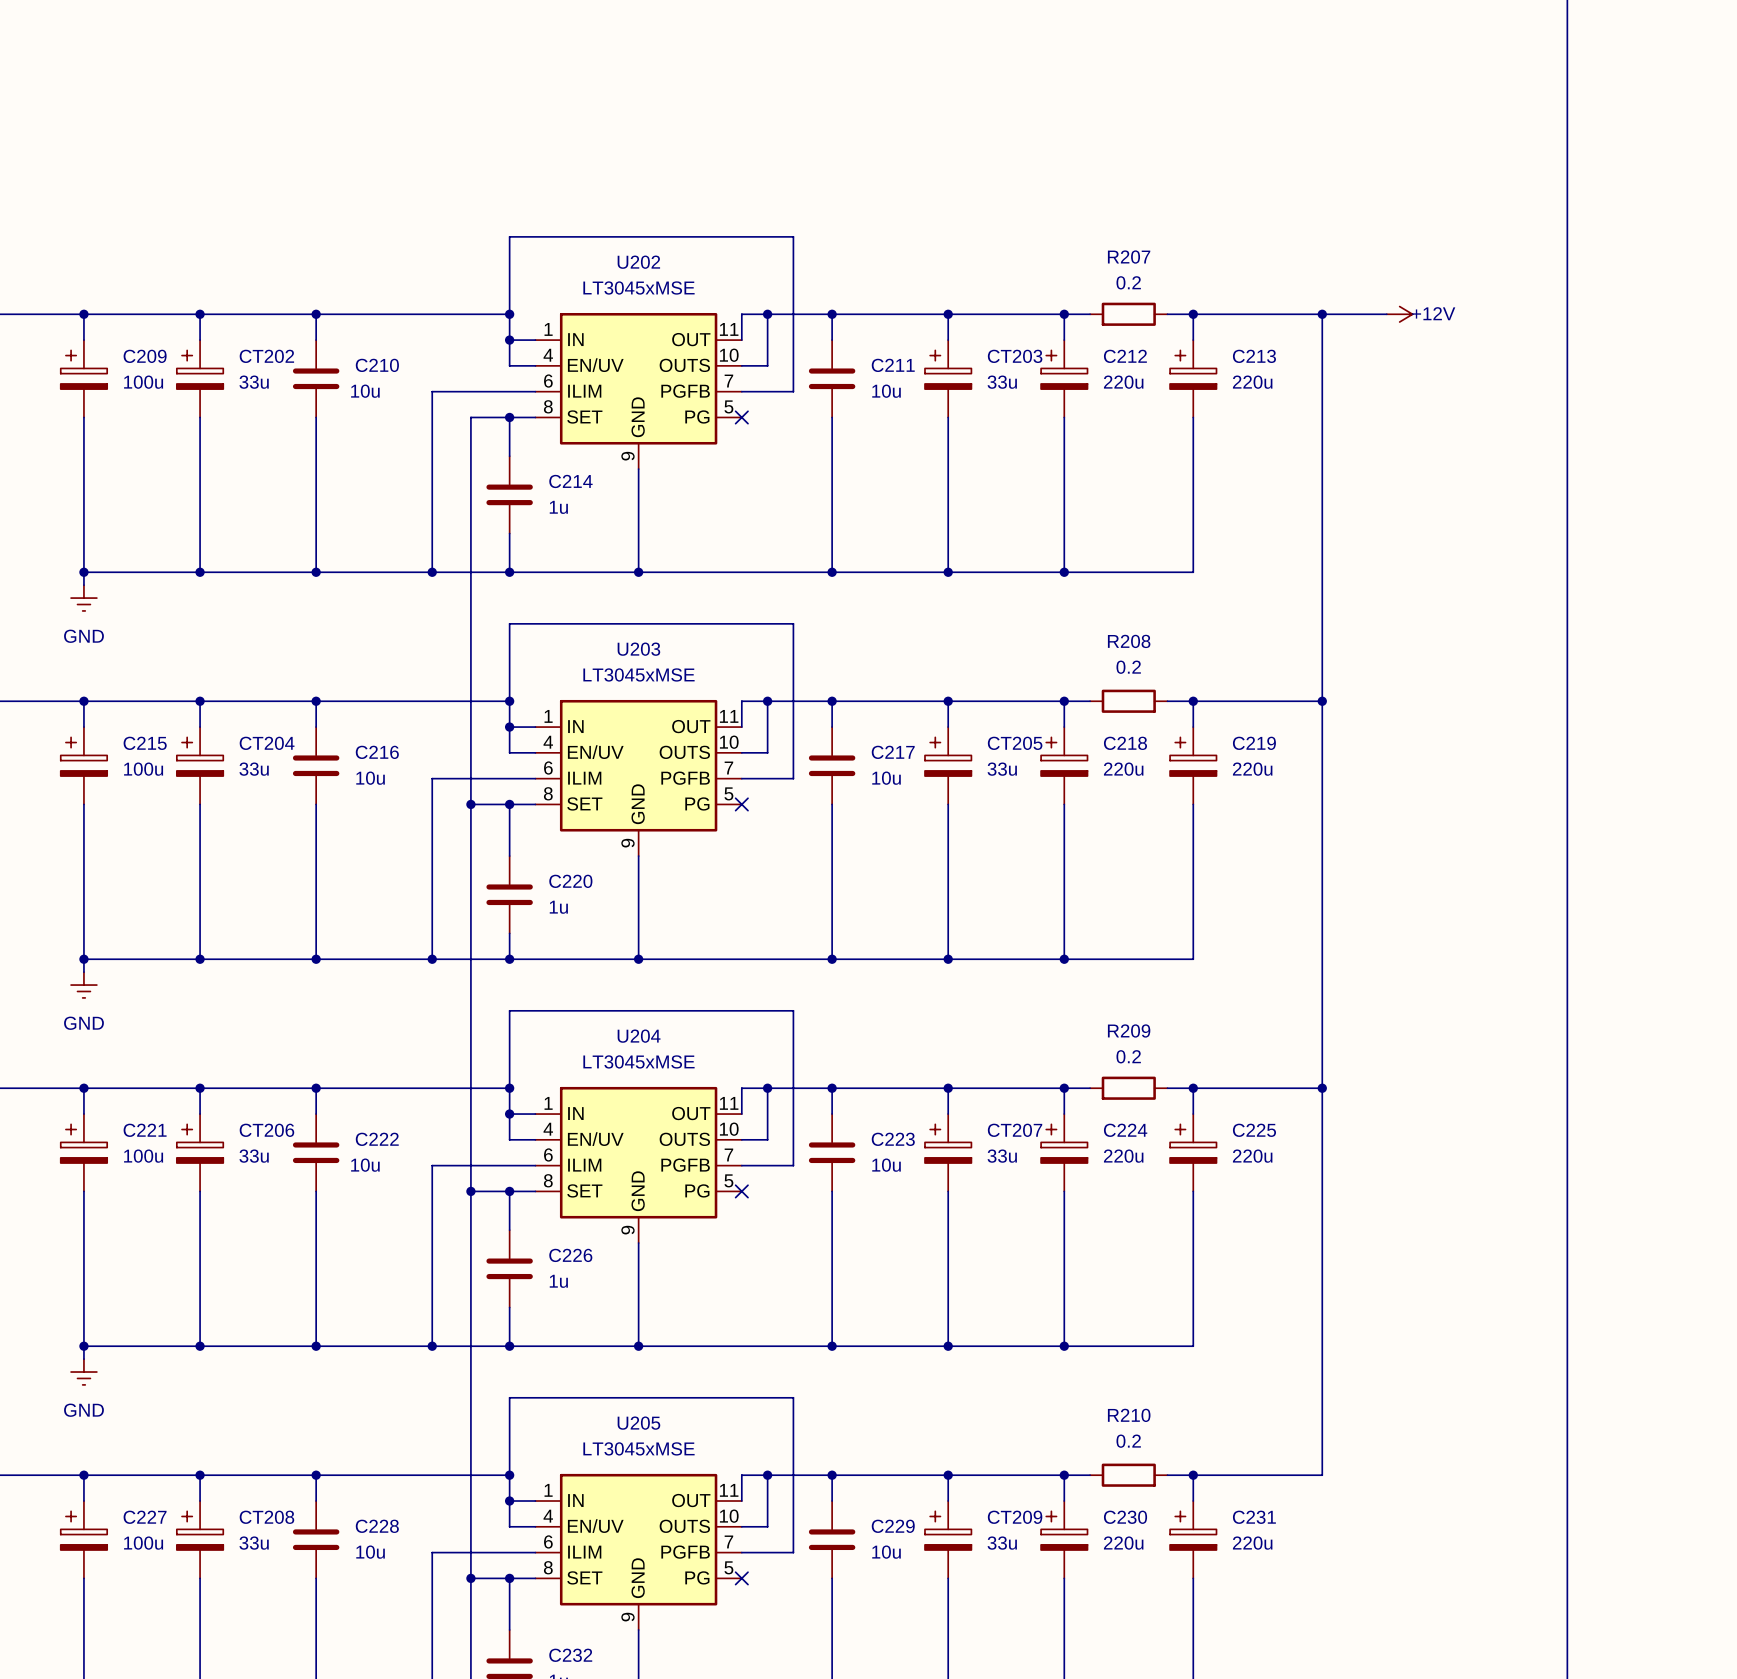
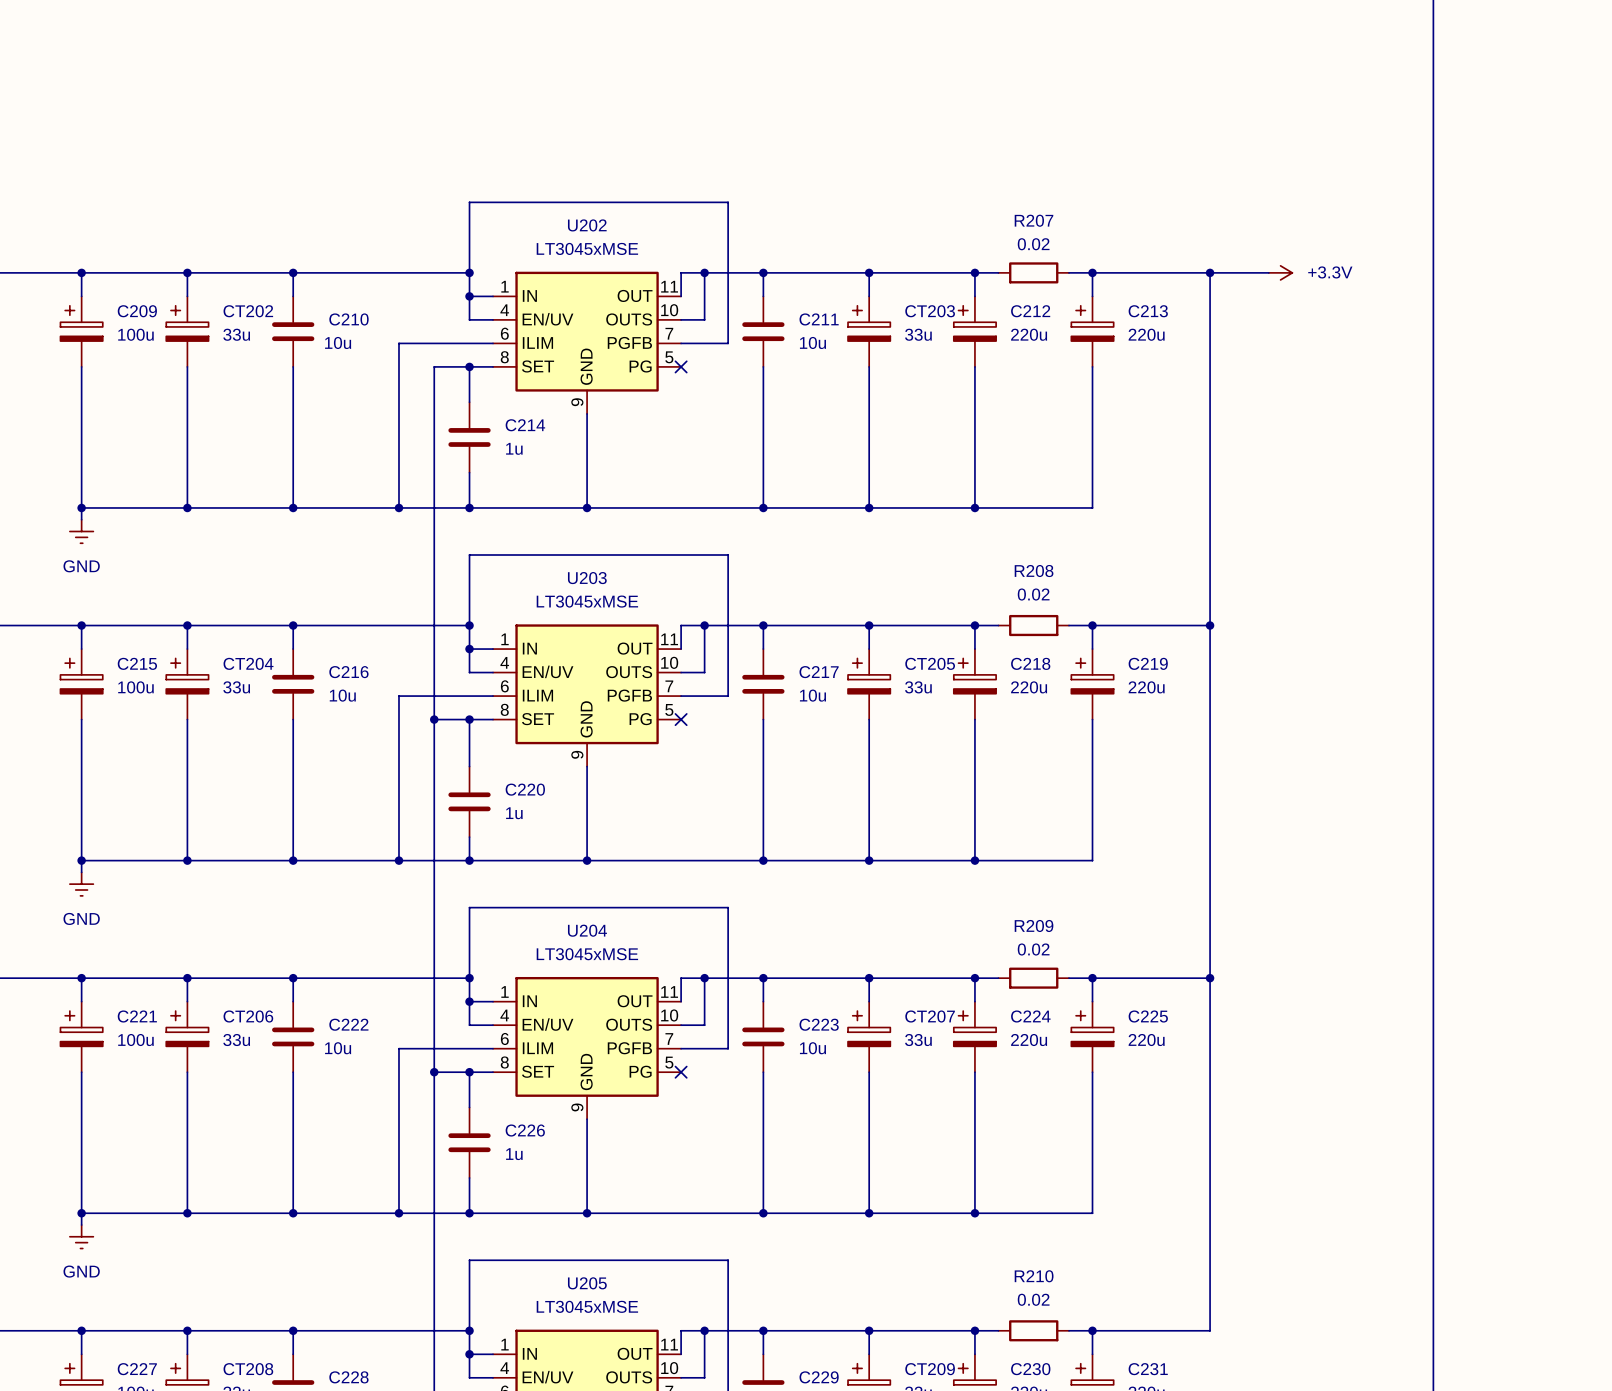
R207 value: 0.2 (1128, 282) -> 0.02 (1033, 244)
power symbol: +12V (1399, 314) -> +3.3V (1280, 272)
R208 value: 0.2 (1128, 667) -> 0.02 (1033, 594)
R209 value: 0.2 (1128, 1056) -> 0.02 (1033, 949)
R210 value: 0.2 (1128, 1441) -> 0.02 (1033, 1299)

